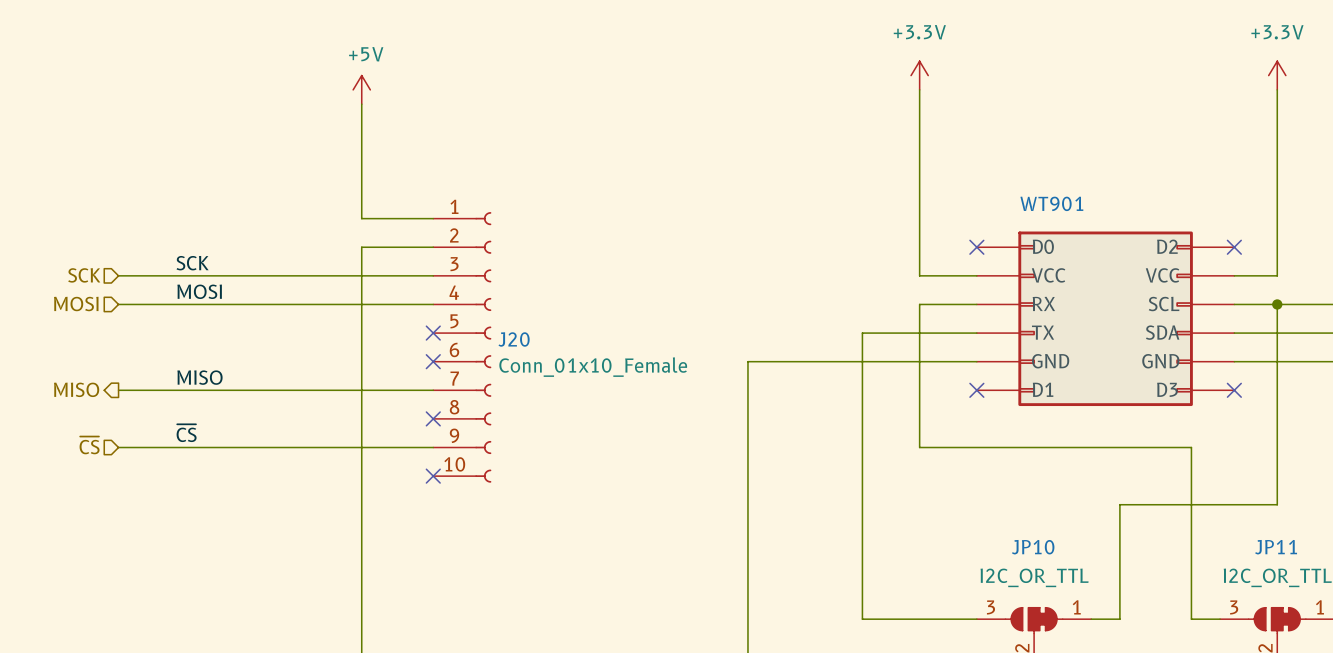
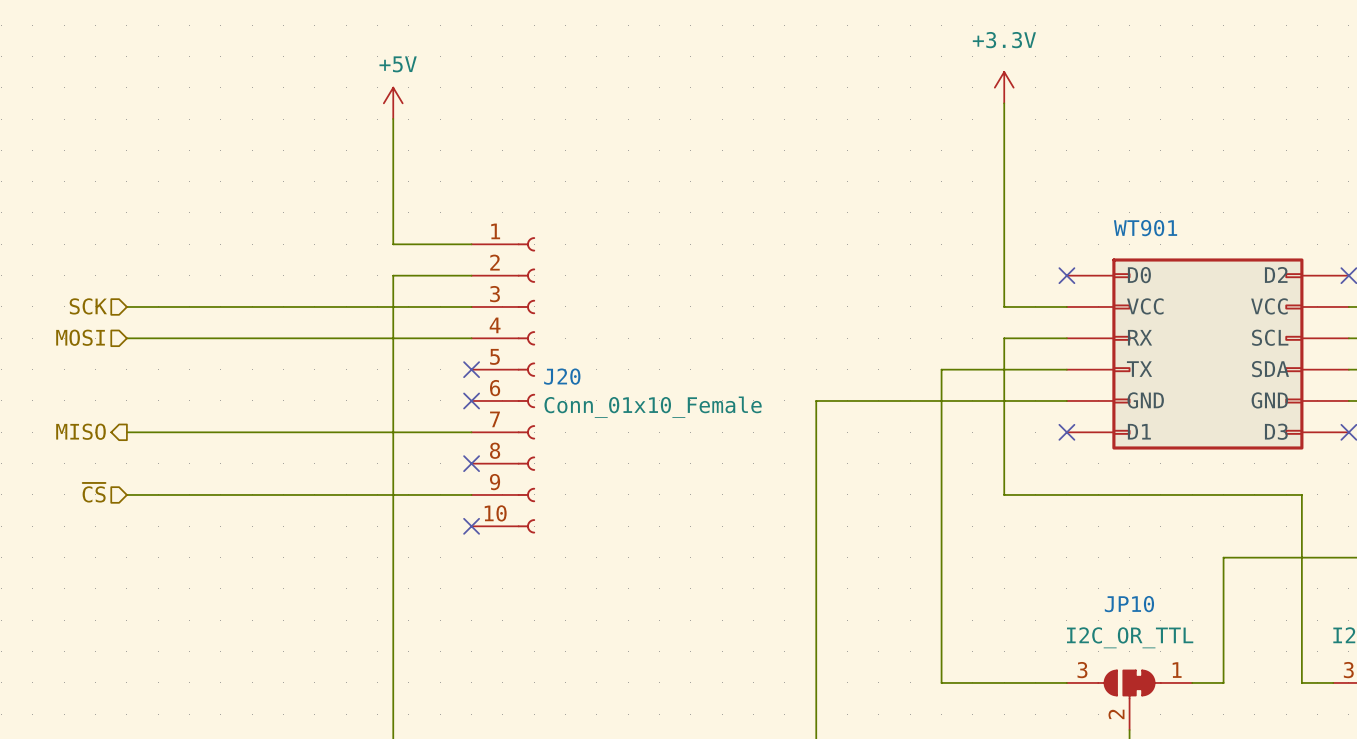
label: SCK (192, 263) -> none
label: MOSI (199, 291) -> none
label: MISO (199, 377) -> none
label: ~{CS} (186, 433) -> none

